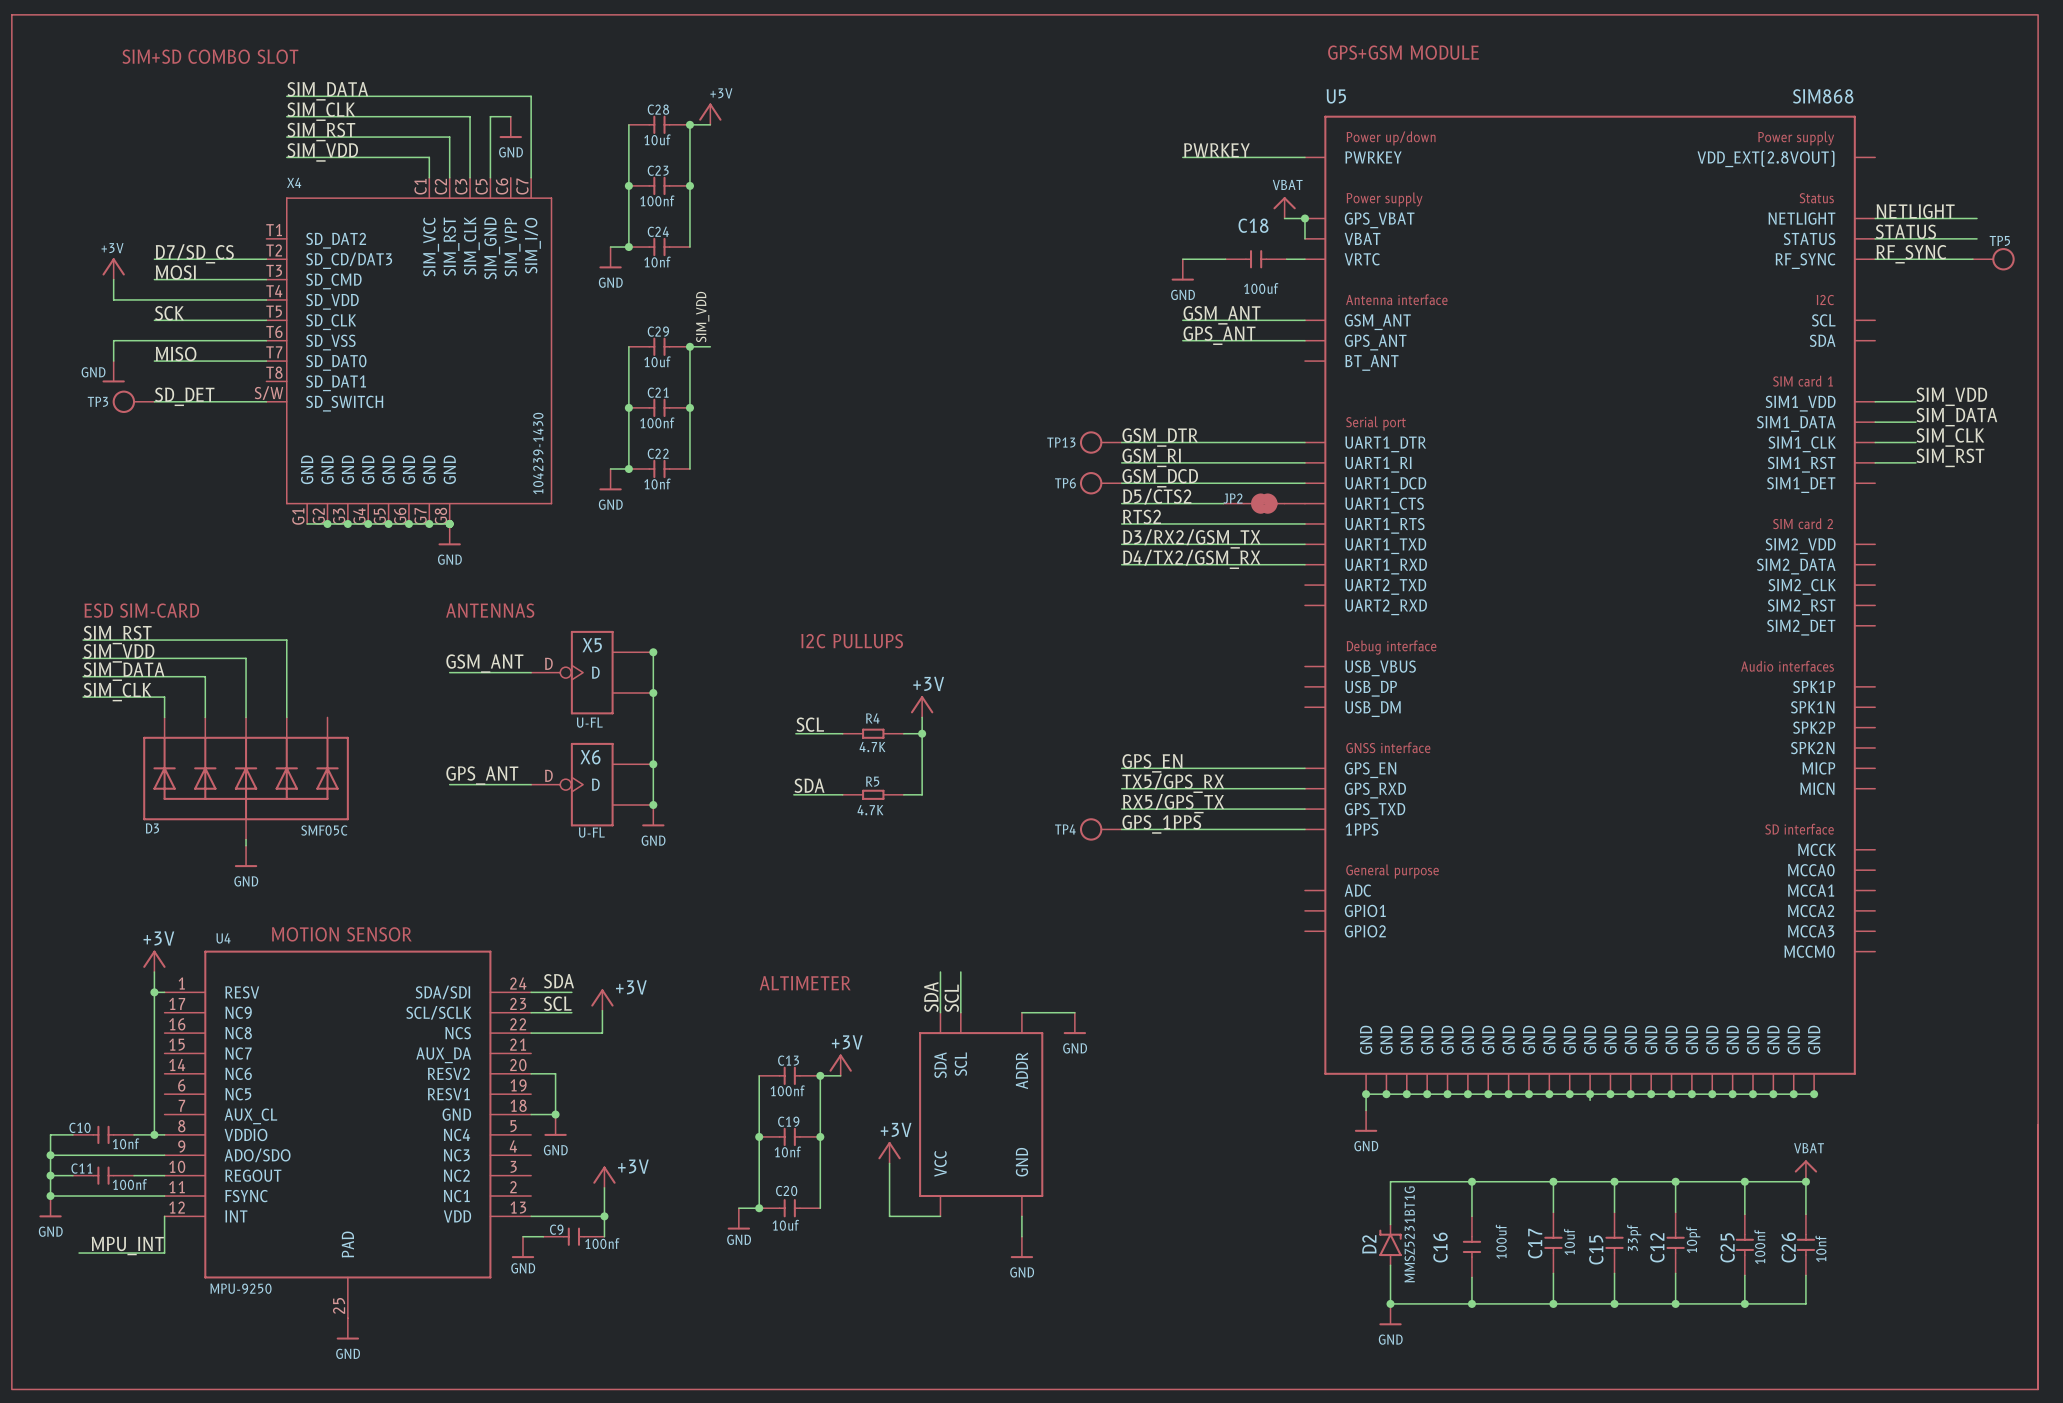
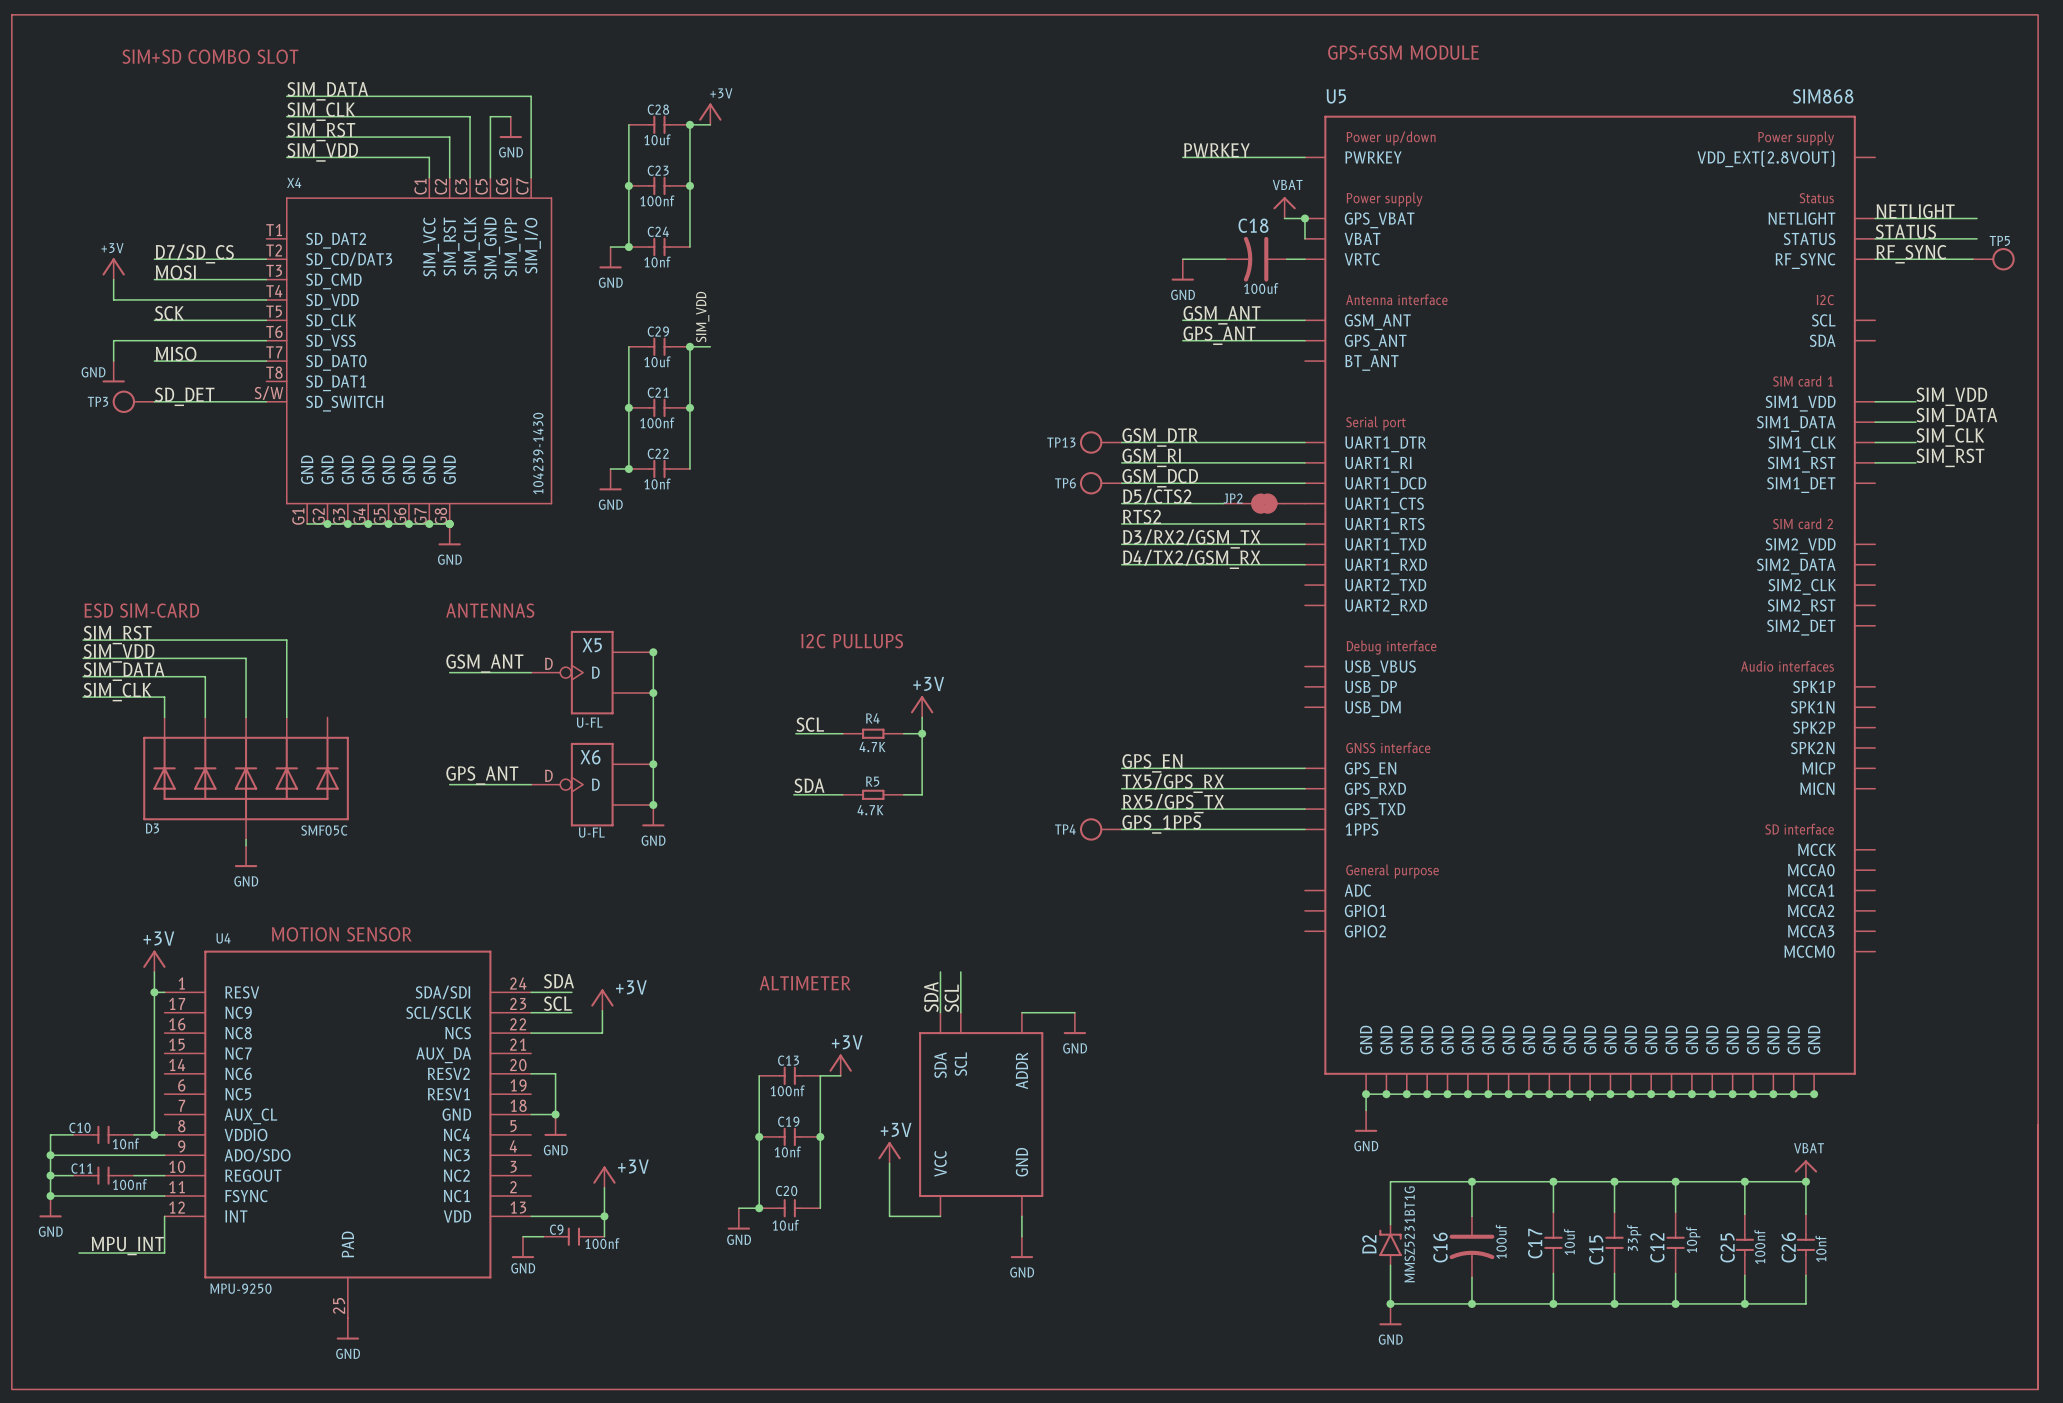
C18 symbol: [1225, 250, 1287, 269] -> [1225, 236, 1287, 282]
junction: (820, 1075) -> none
C16 symbol: [1462, 1216, 1482, 1278] -> [1449, 1216, 1495, 1278]

